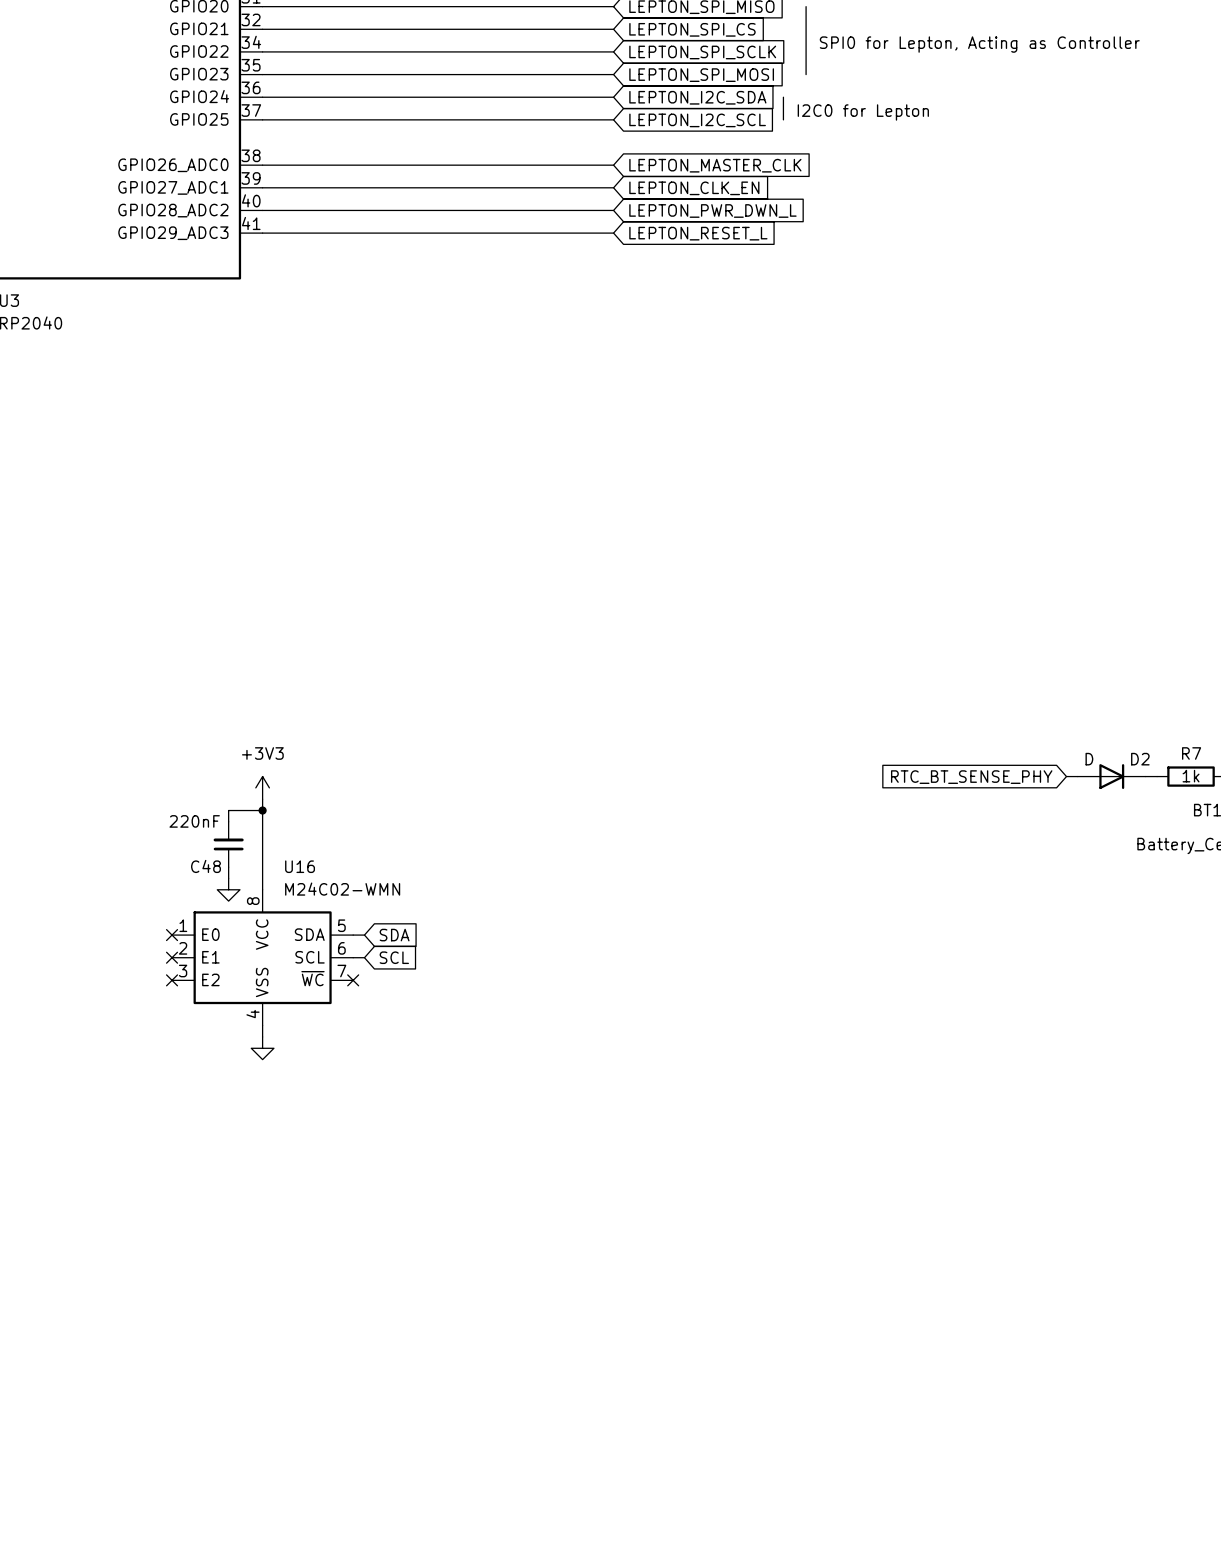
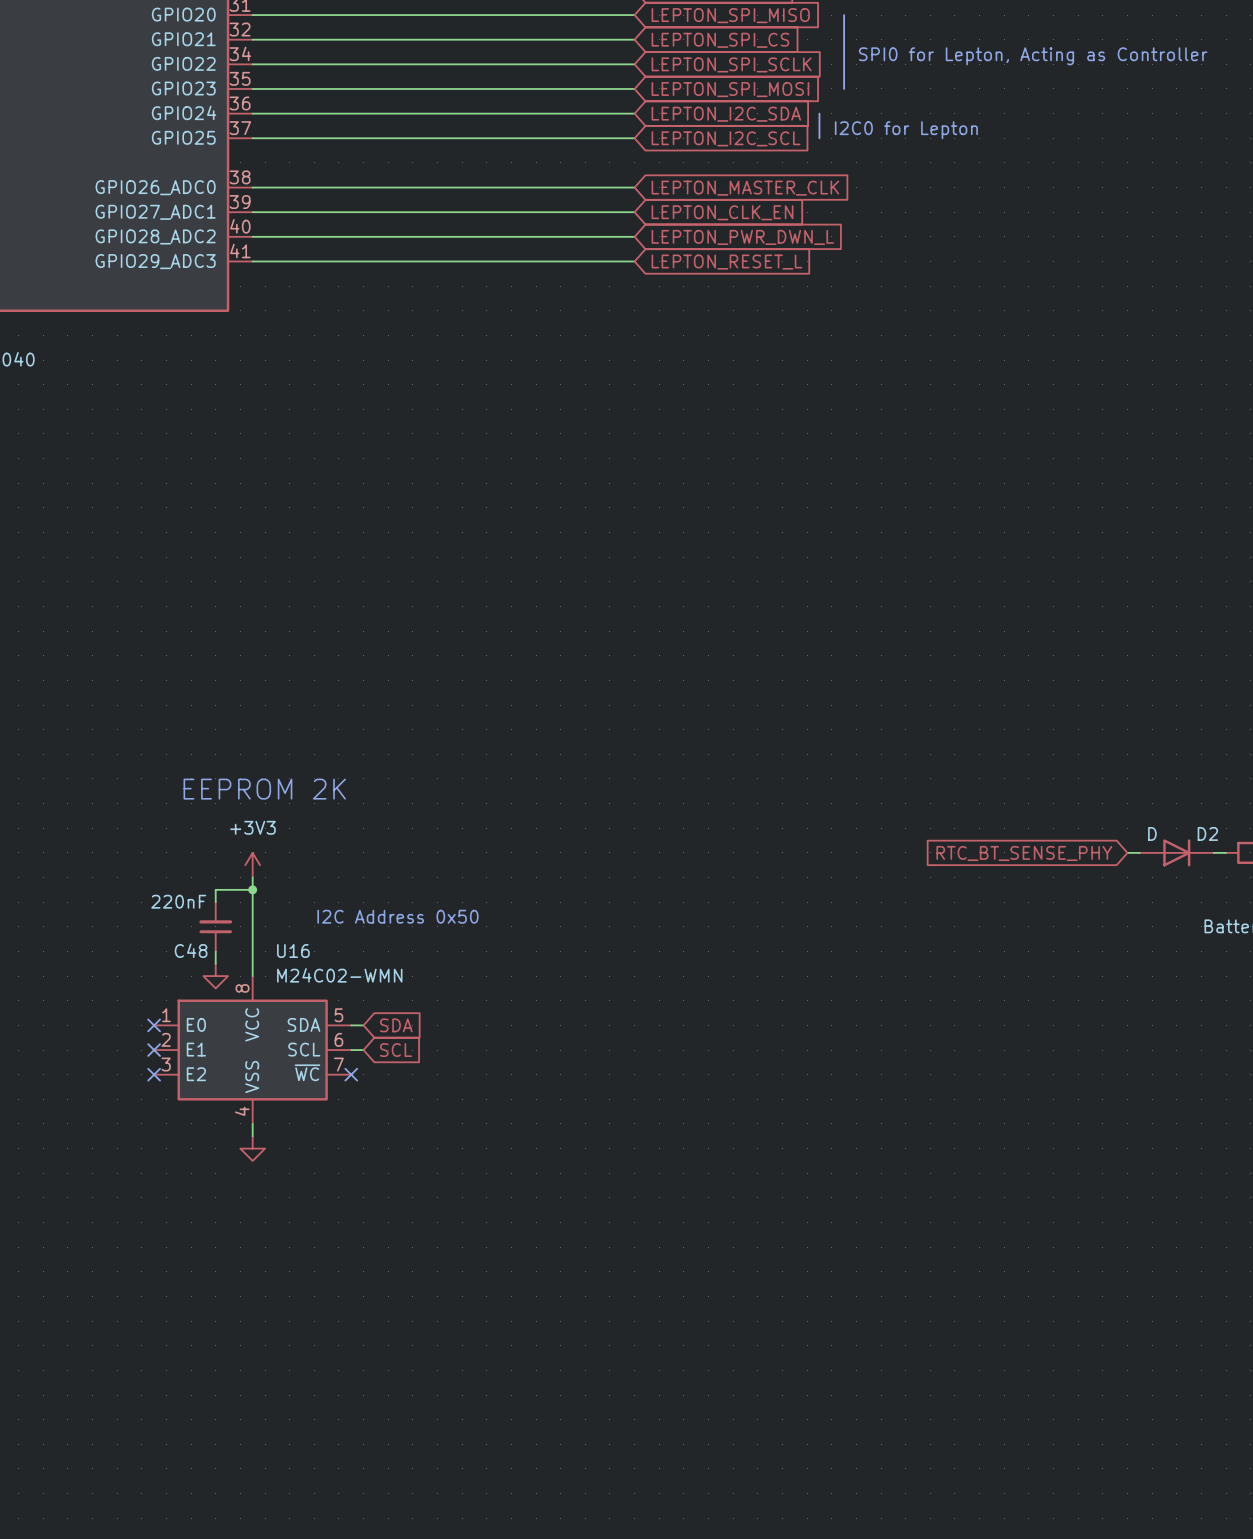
text: none -> EEPROM 2K (264, 789)
text: none -> I2C Address 0x50 (397, 916)

